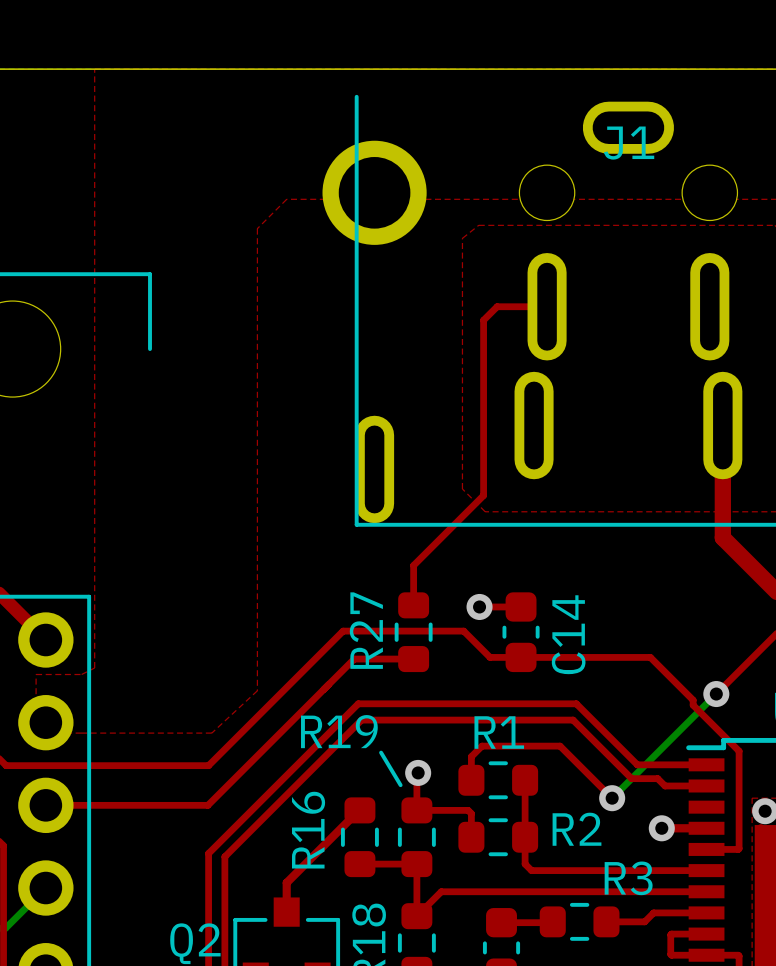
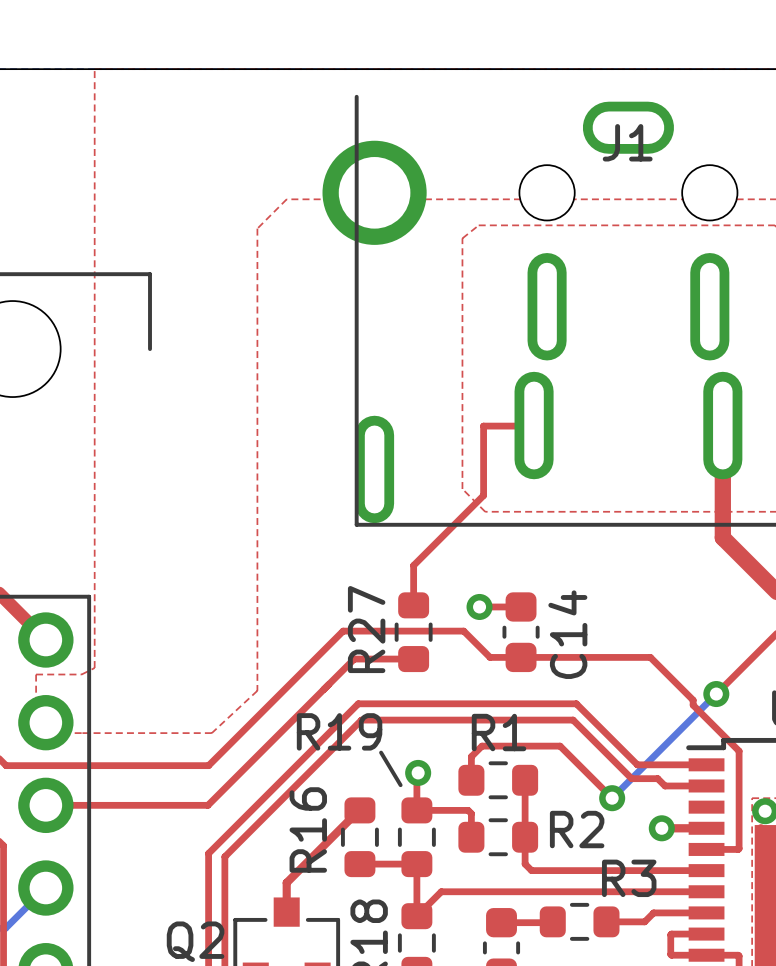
top track: (547, 306) (497, 306) (483, 320) (483, 426) -> (534, 425) (483, 426)

